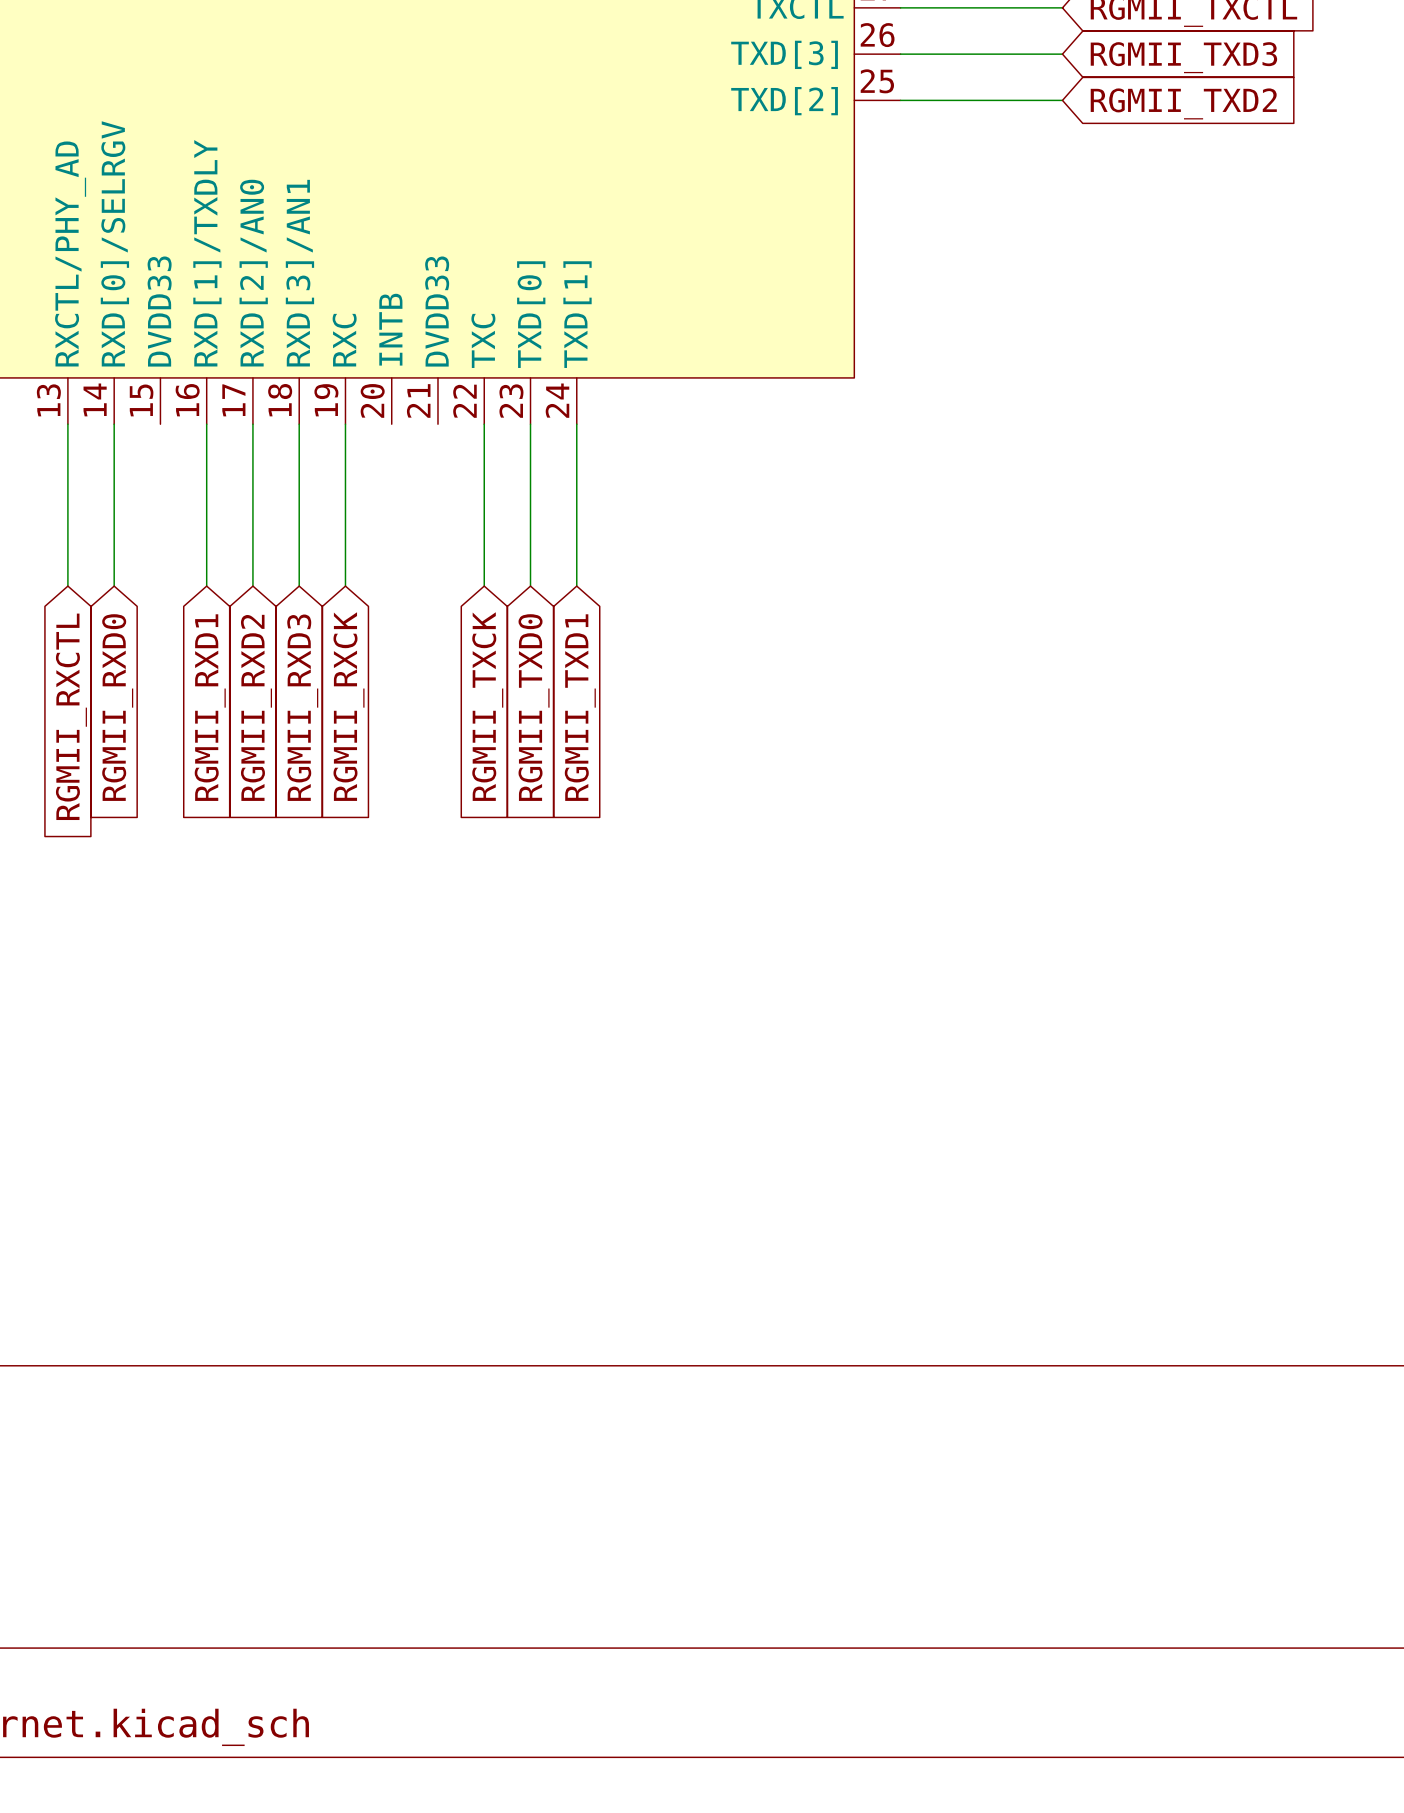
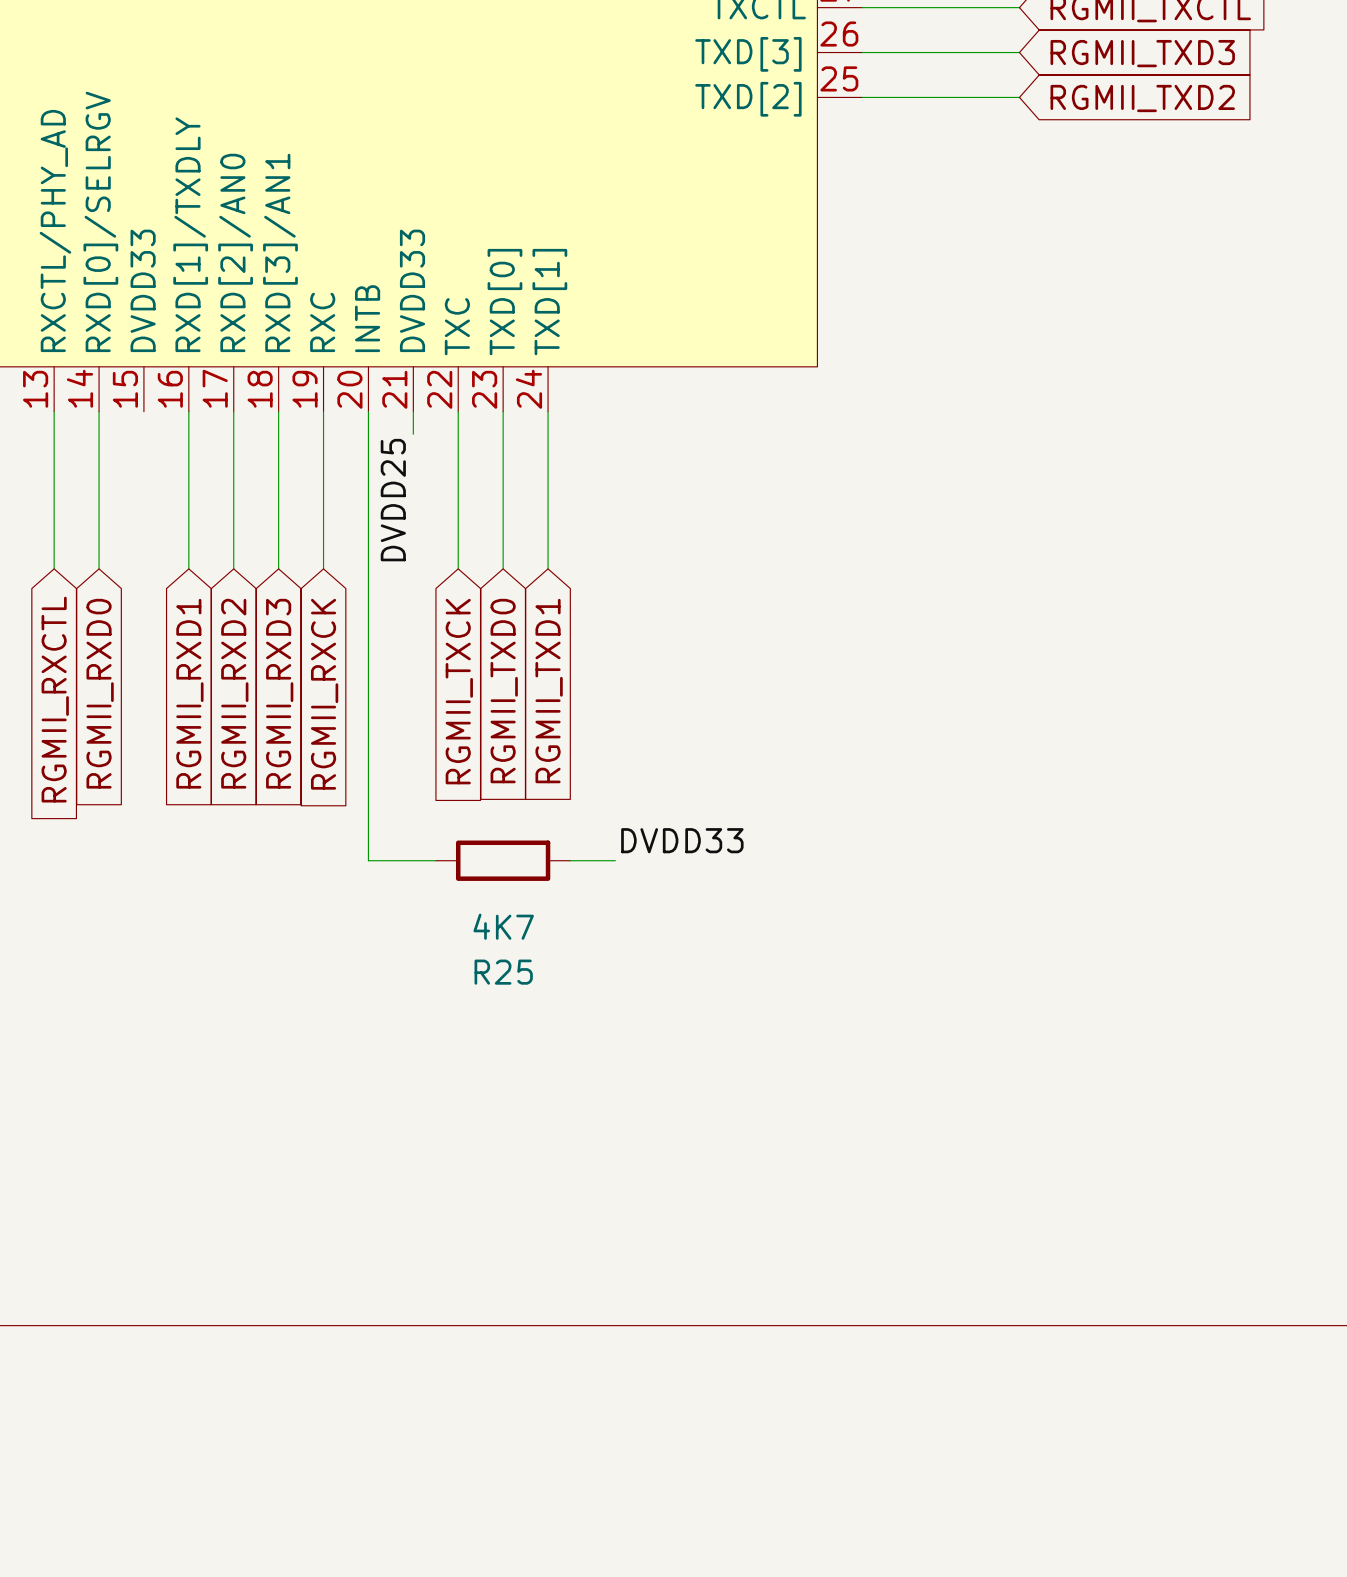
wire: none -> (368, 411) (368, 860) (435, 860)
wire: none -> (413, 411) (413, 434)
label: none -> DVDD25 (393, 500)
label: none -> DVDD33 (682, 840)
R25: none -> 4K7 (503, 860)
wire: none -> (570, 860) (615, 860)

